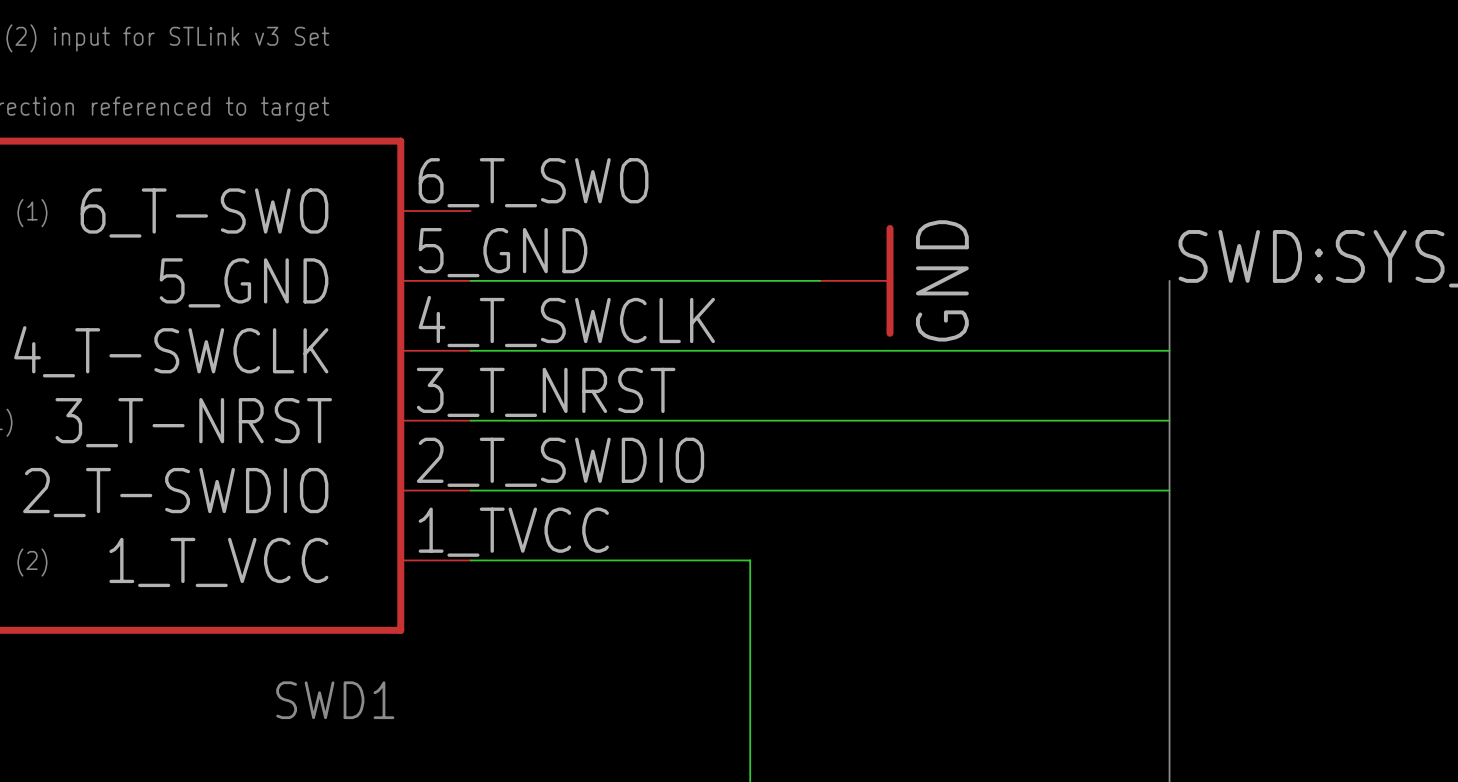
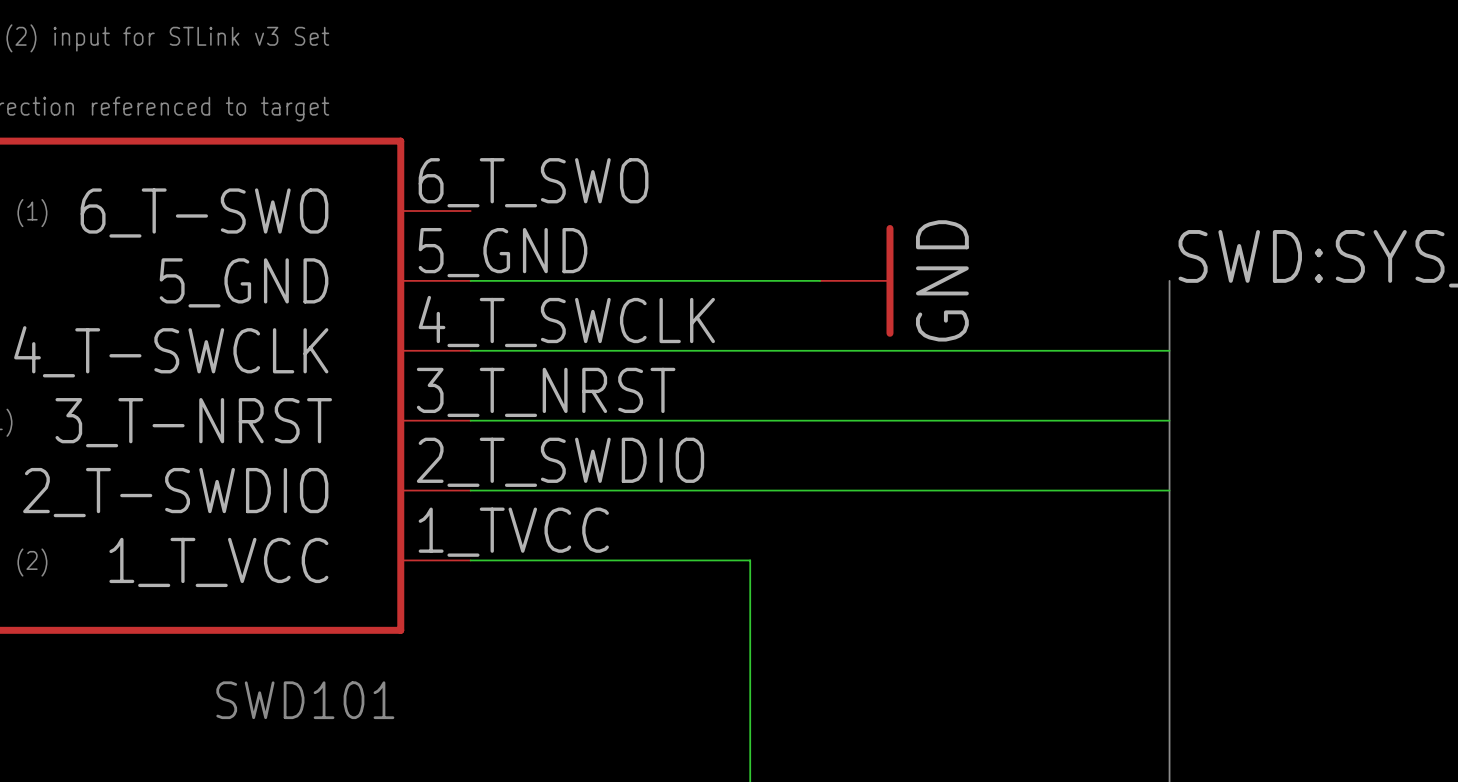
SWD1 name: SWD1 (335, 700) -> SWD101 (305, 700)

